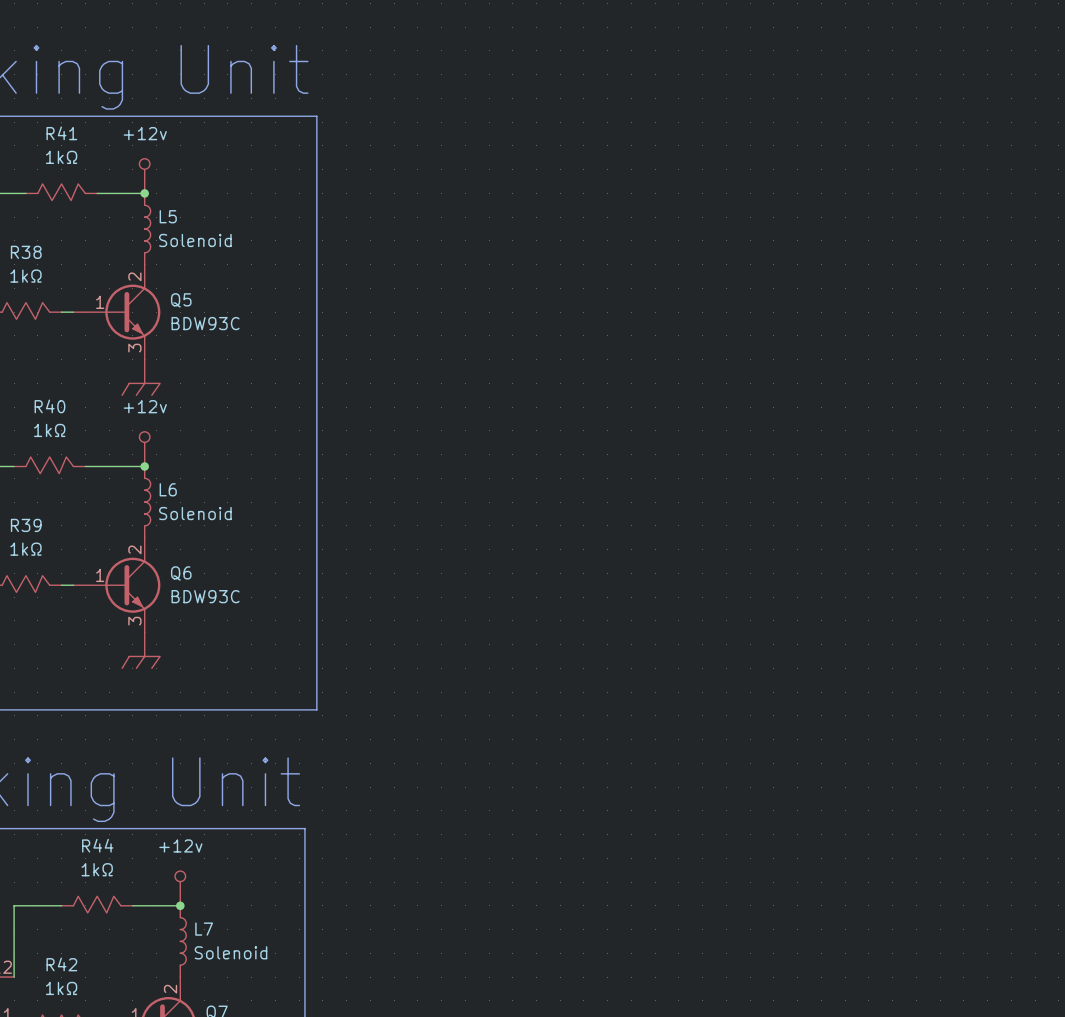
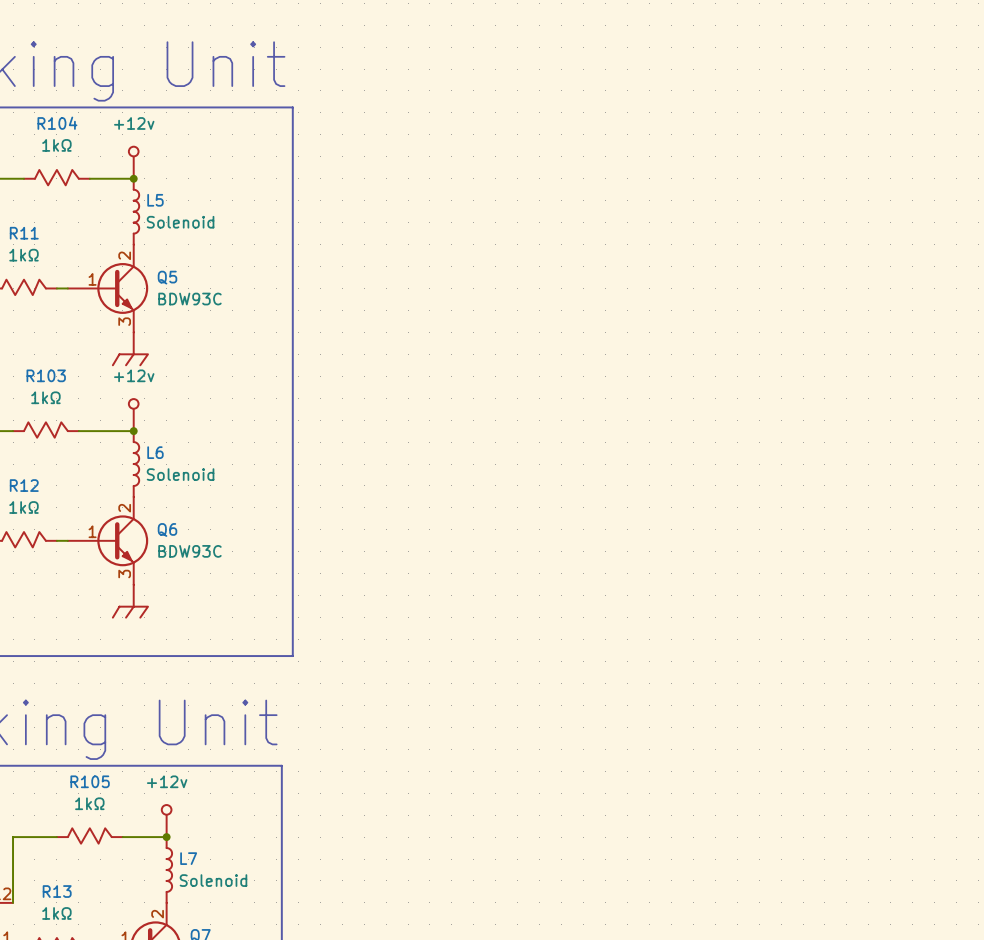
R41 name: R41 (61, 133) -> R104 (57, 123)
R38 name: R38 (26, 252) -> R11 (24, 233)
R40 name: R40 (49, 406) -> R103 (46, 375)
R39 name: R39 (26, 525) -> R12 (24, 485)
R44 name: R44 (97, 845) -> R105 (90, 781)
R42 name: R42 (61, 964) -> R13 (57, 891)

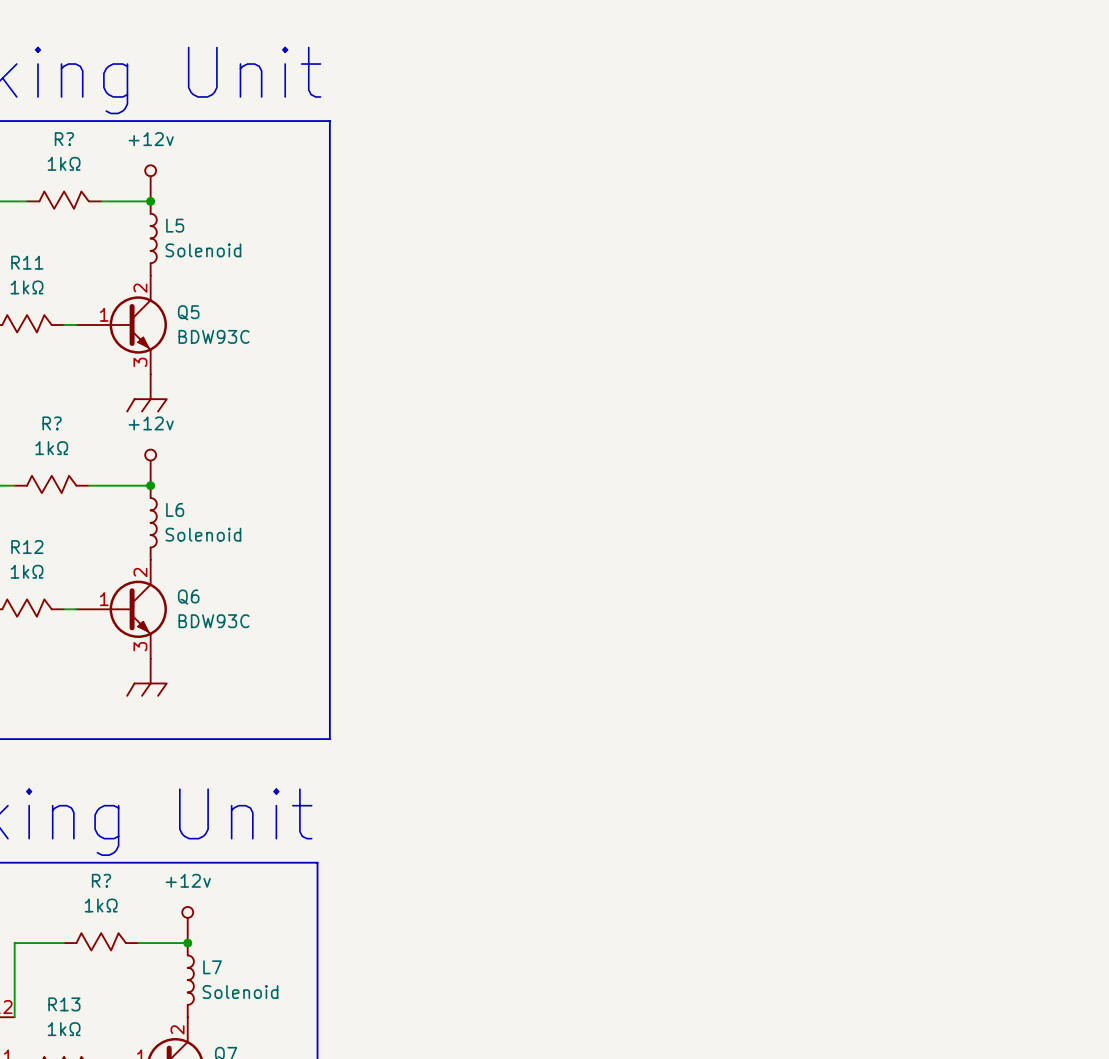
R104 name: R104 (57, 123) -> R? (64, 139)
R103 name: R103 (46, 375) -> R? (52, 423)
R105 name: R105 (90, 781) -> R? (101, 880)

